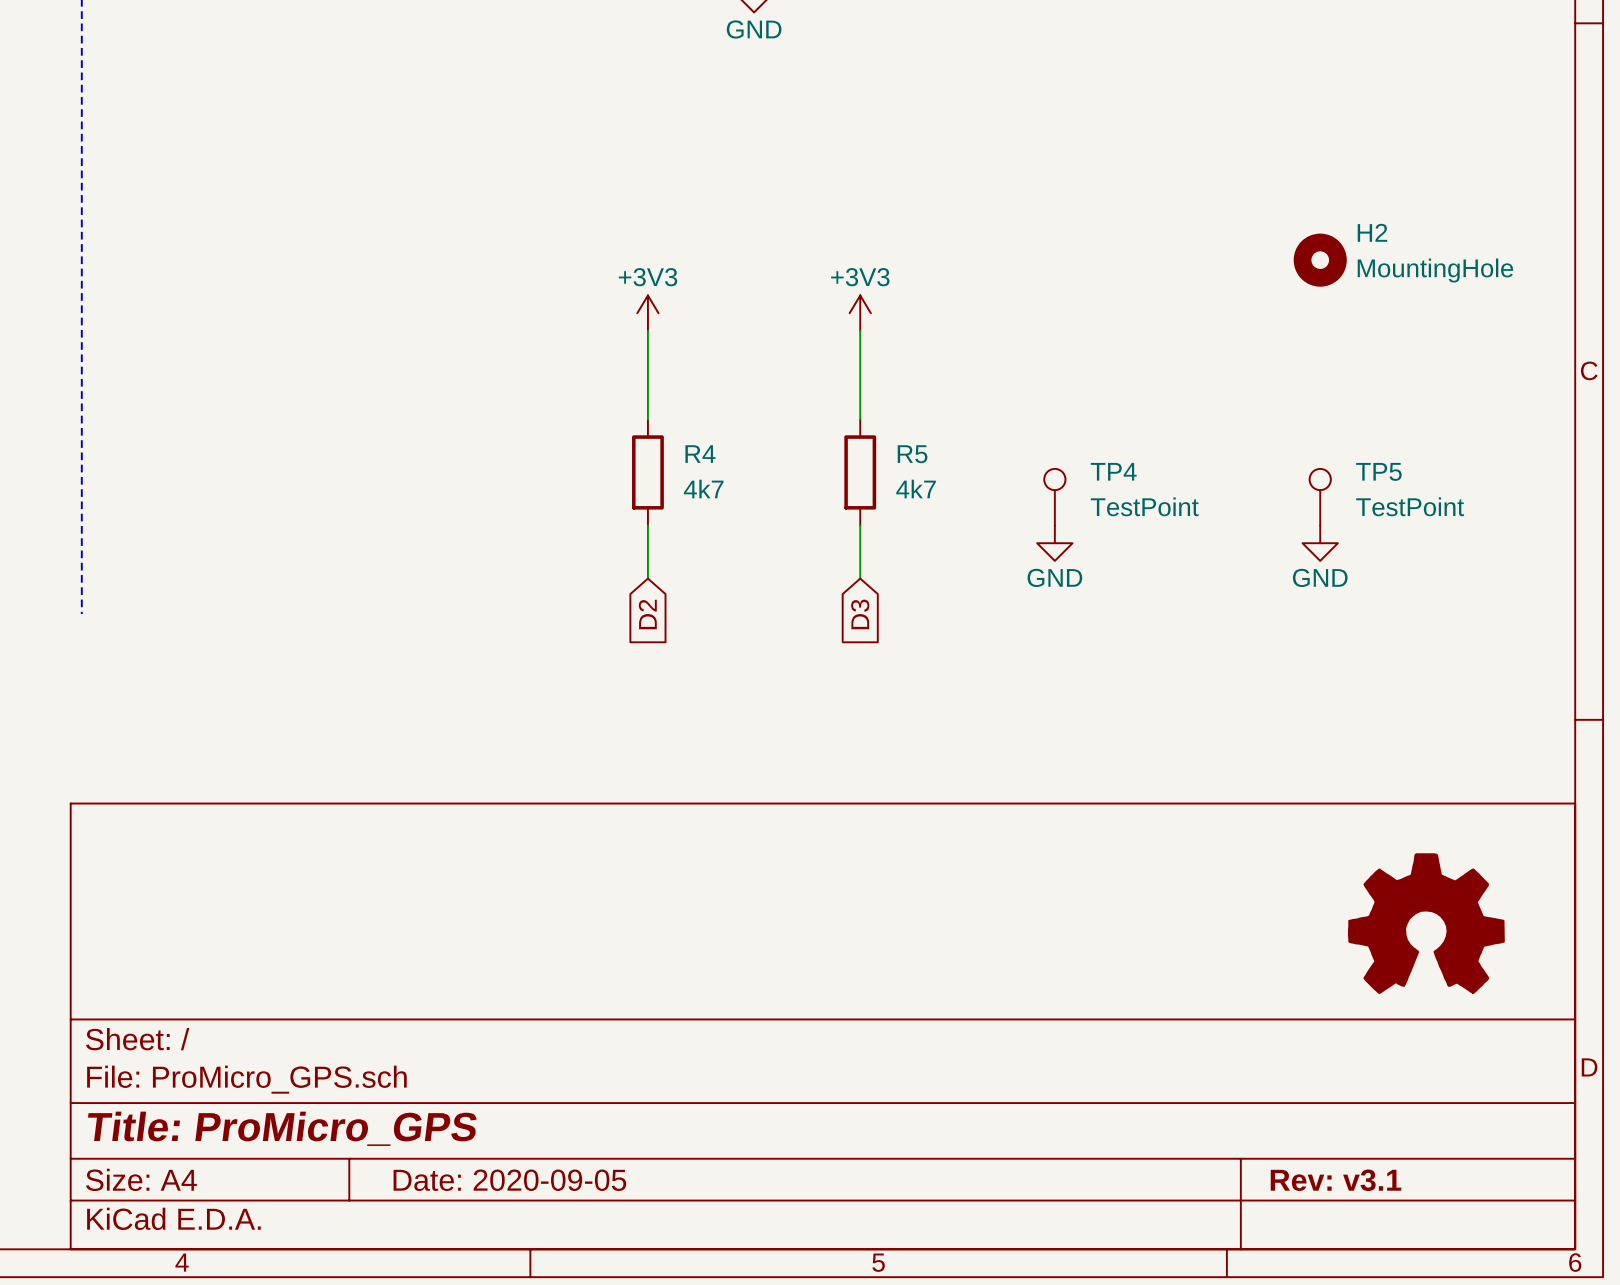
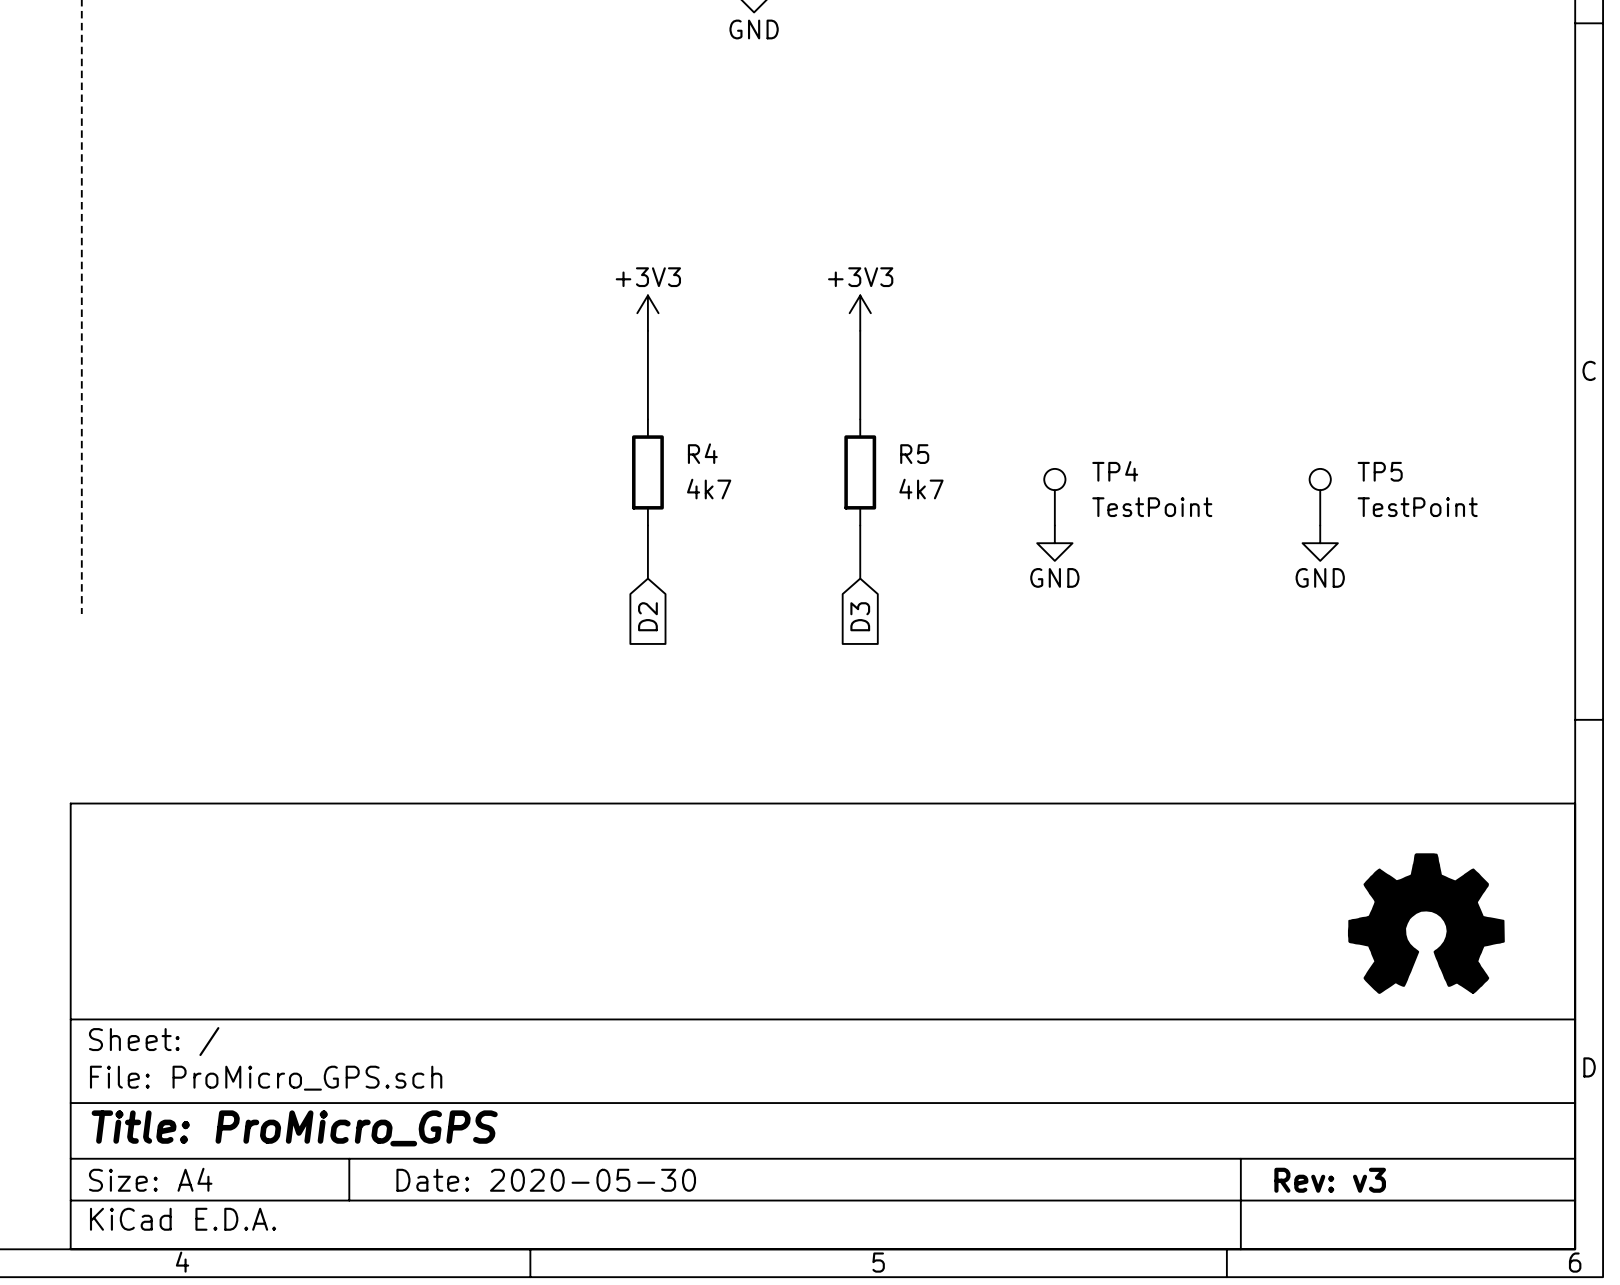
H2: MountingHole (1320, 260) -> none
title block: Date: 2020-09-05 (509, 1180) -> Date: 2020-05-30 (546, 1180)
title block: Rev: v3.1 (1336, 1180) -> Rev: v3 (1330, 1180)

